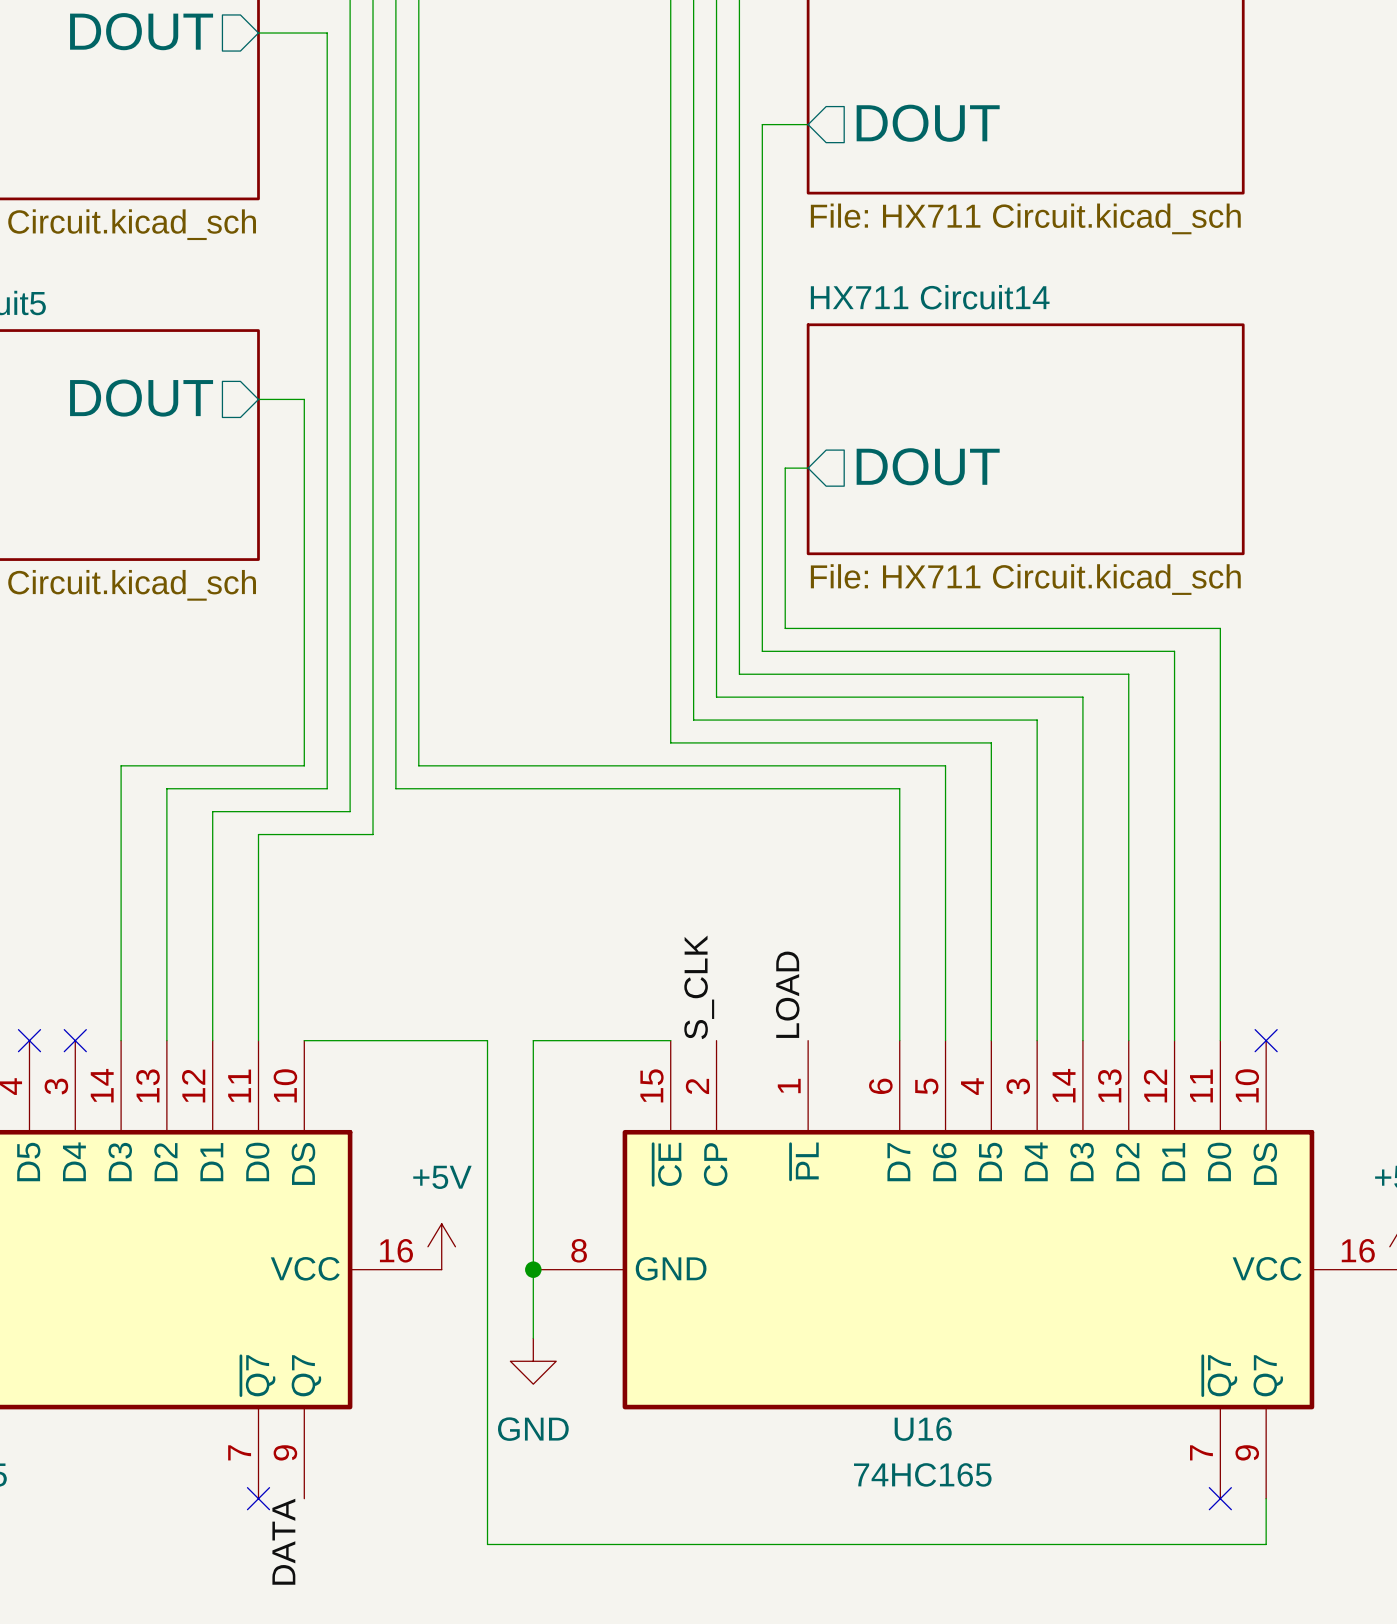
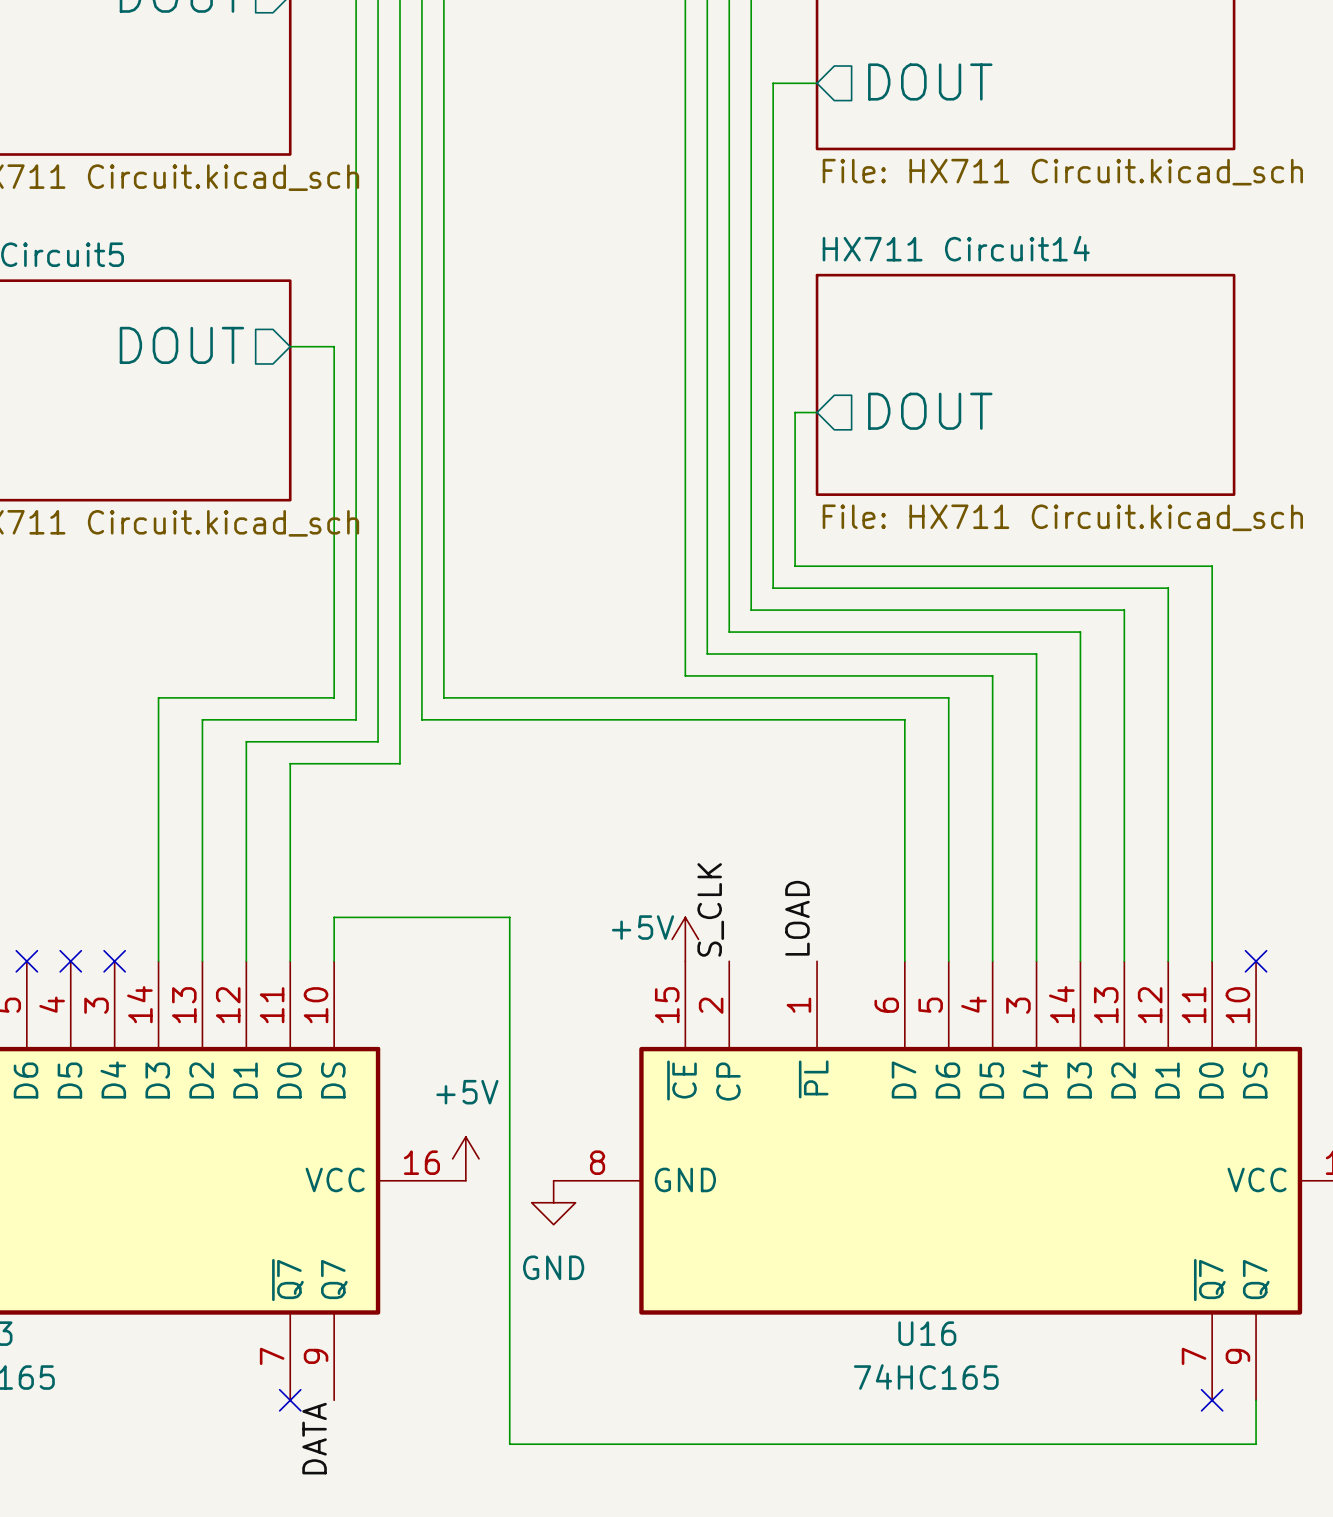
power symbol: none -> +5V (685, 939)
wire: (304, 1040) (487, 1040) -> (334, 961) (334, 917) (509, 917) (509, 961)
wire: (670, 1040) (533, 1040) (533, 1338) -> none
junction: (533, 1269) -> none
power symbol position: GND (533, 1361) -> GND (553, 1202)

